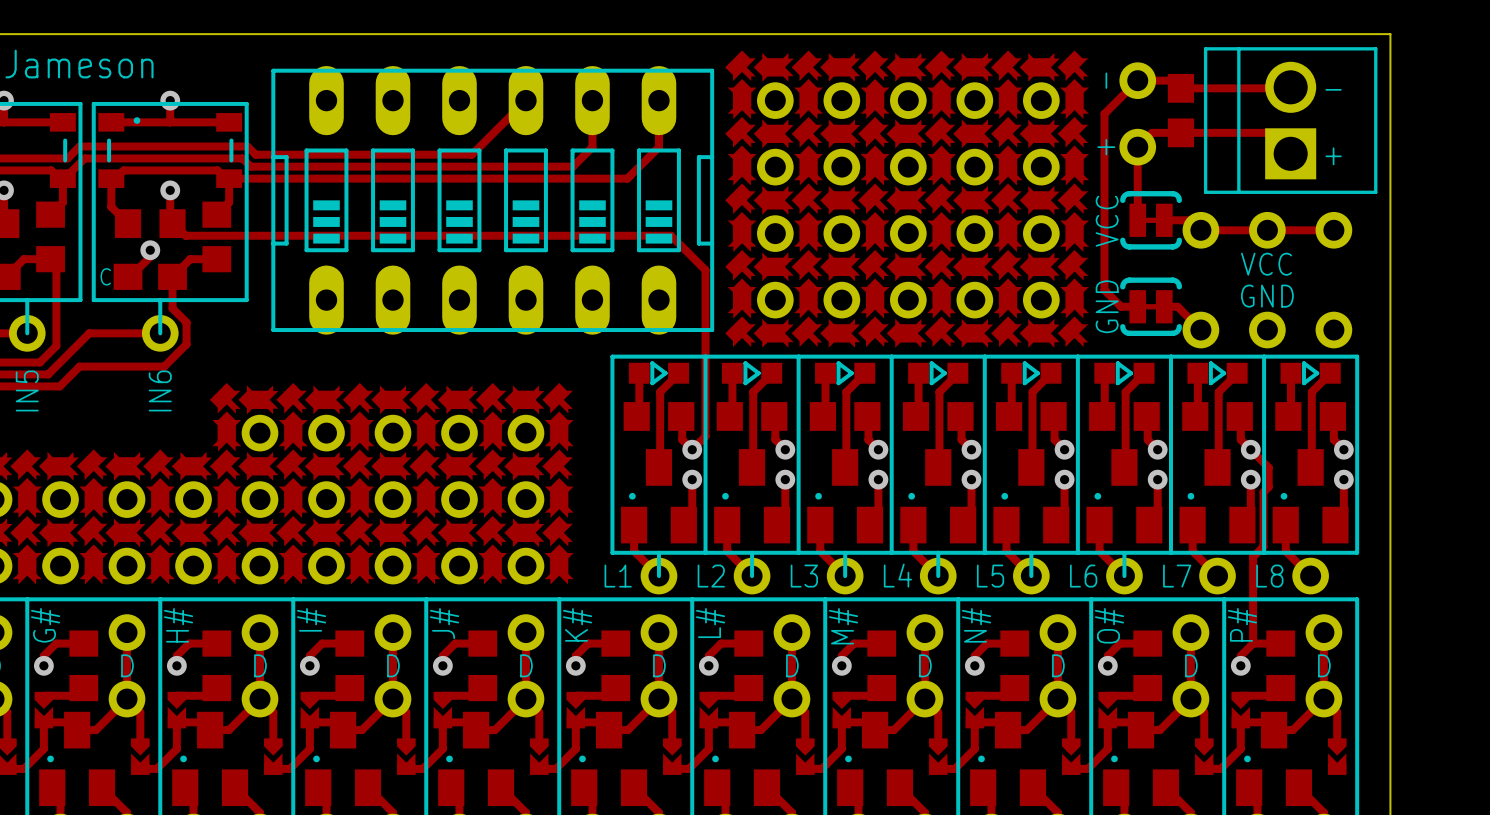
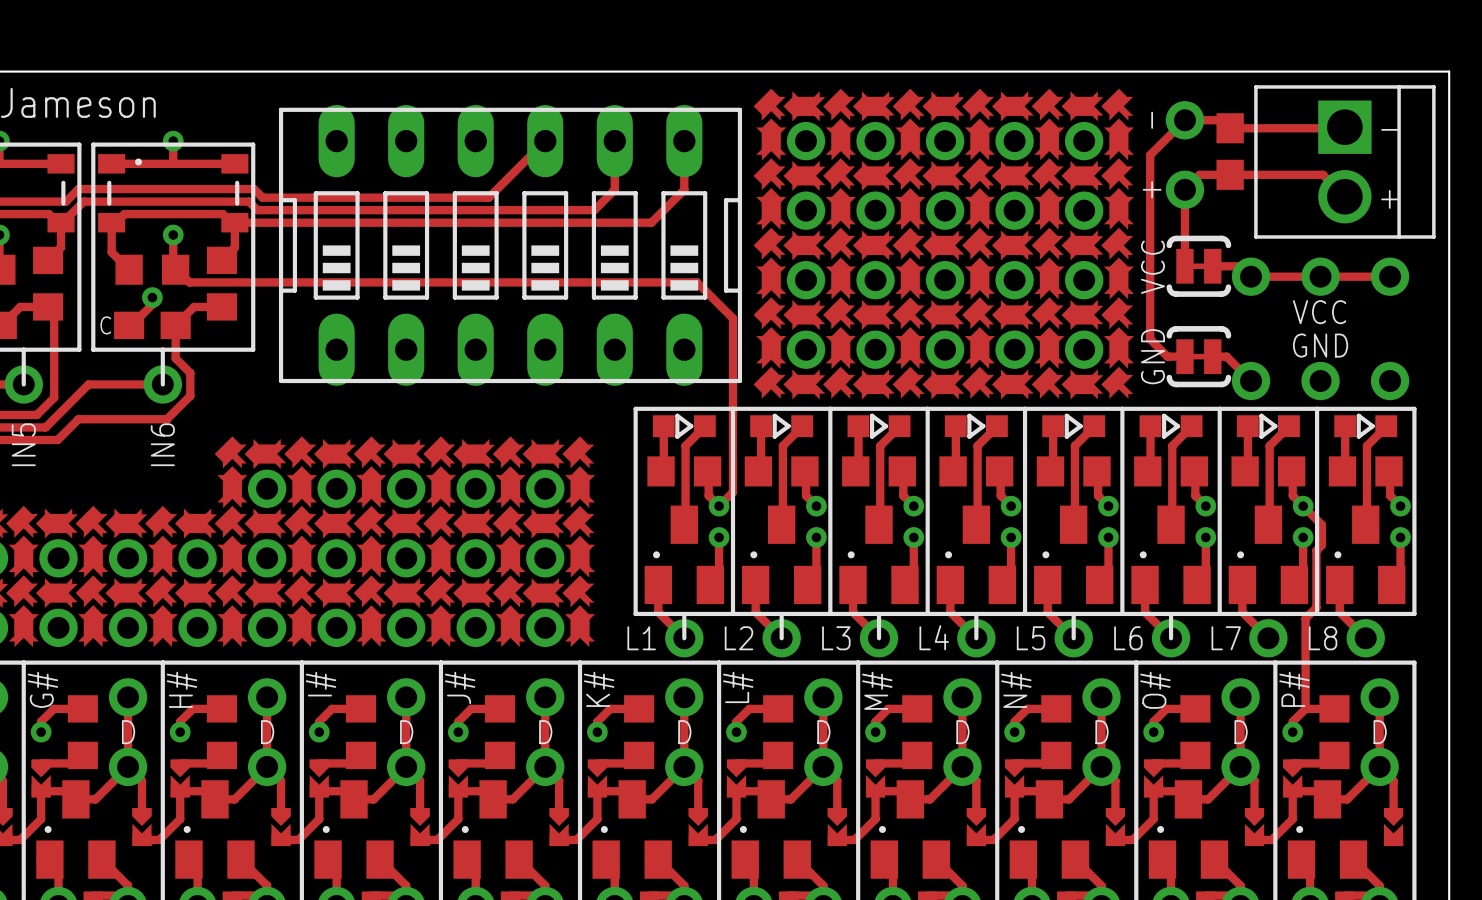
part rotation: 0° (1290, 120) -> 180° (1344, 161)

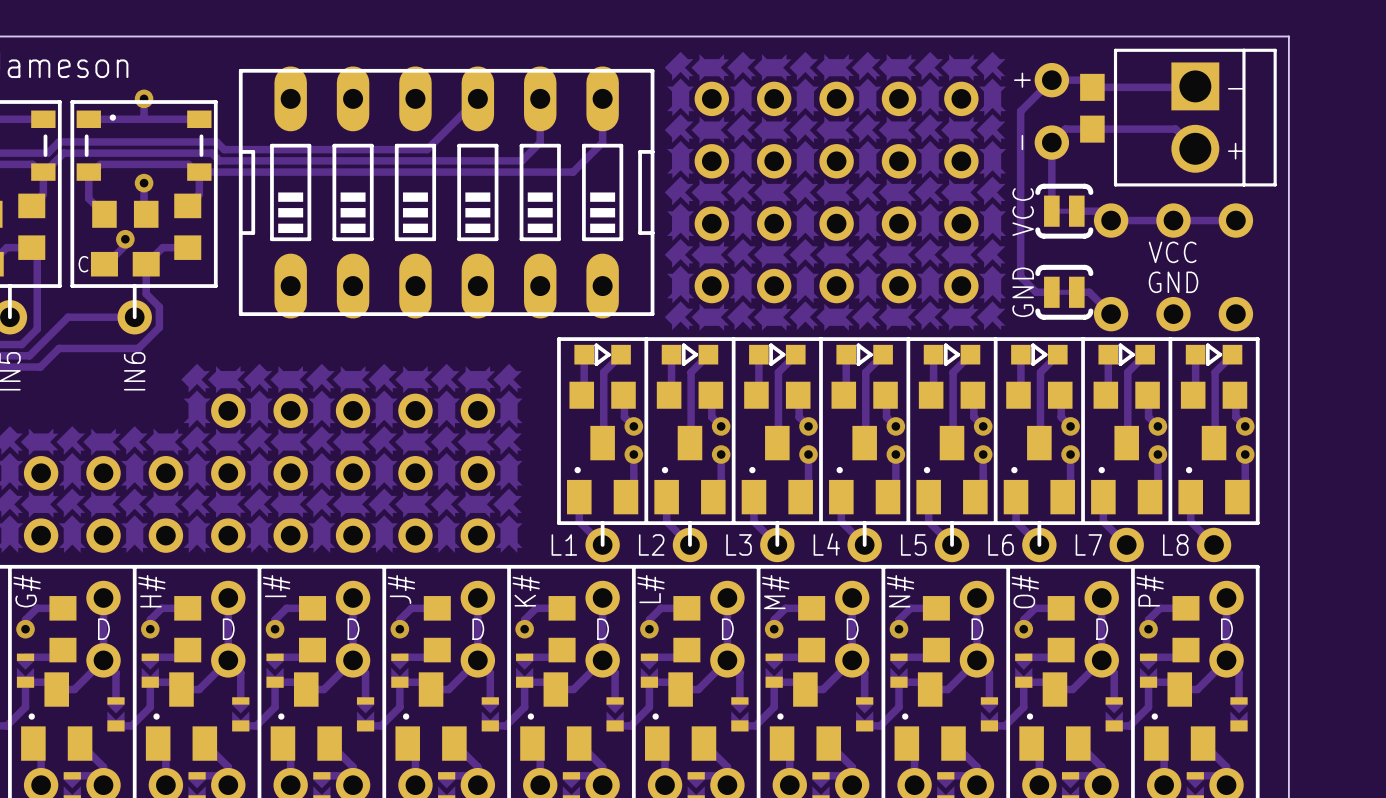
text: - (1152, 120) -> + (1022, 80)
text: + (1152, 189) -> - (1022, 142)
track: (175, 269) (189, 282) (696, 282) (733, 318) (733, 492) (719, 506) -> none
track: (1303, 506) (1321, 524) (1321, 545) (1316, 550) (1316, 607) (1305, 618) (1305, 708) -> none

